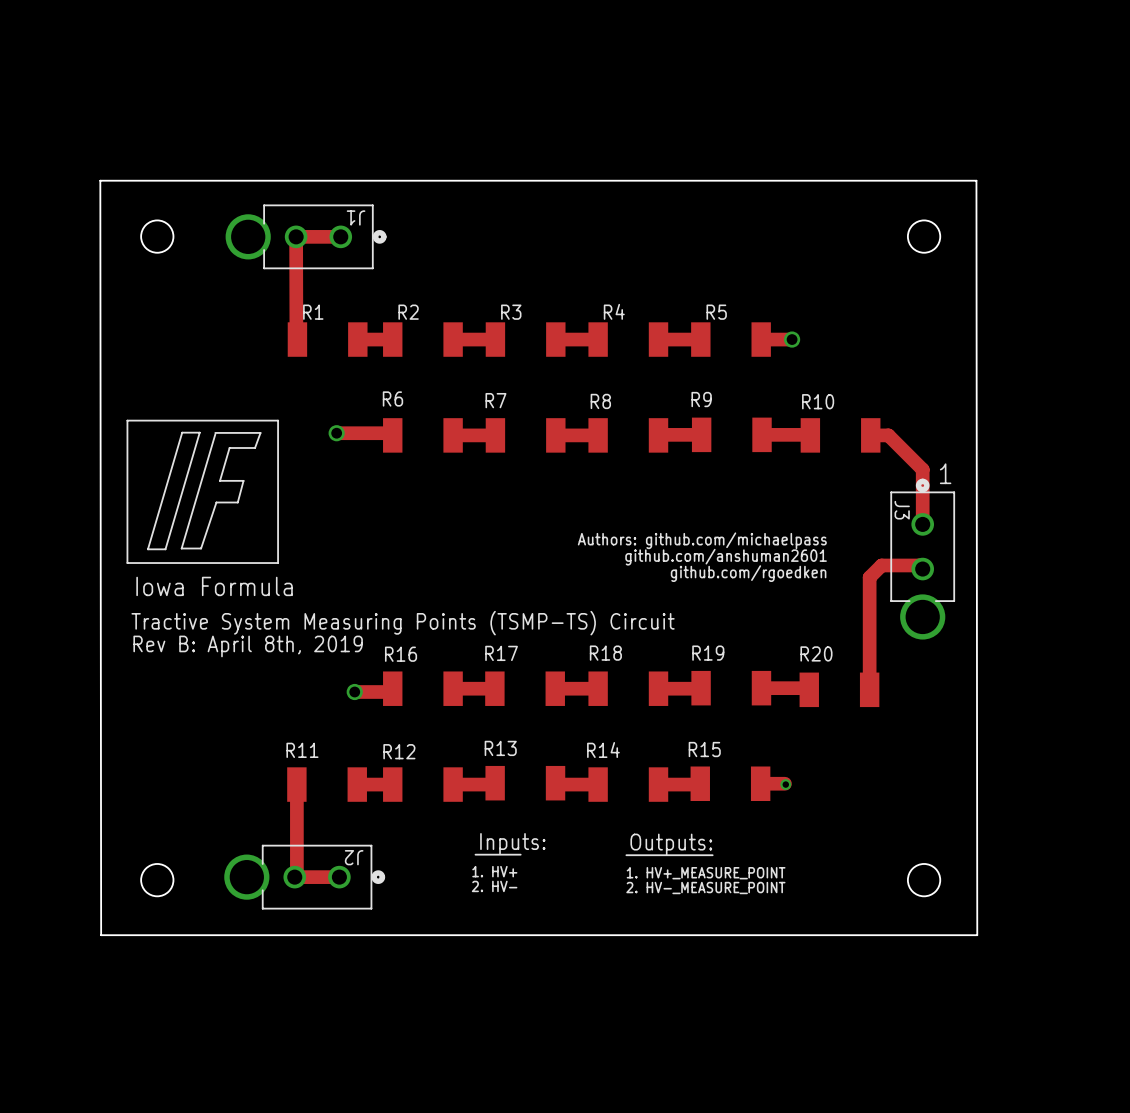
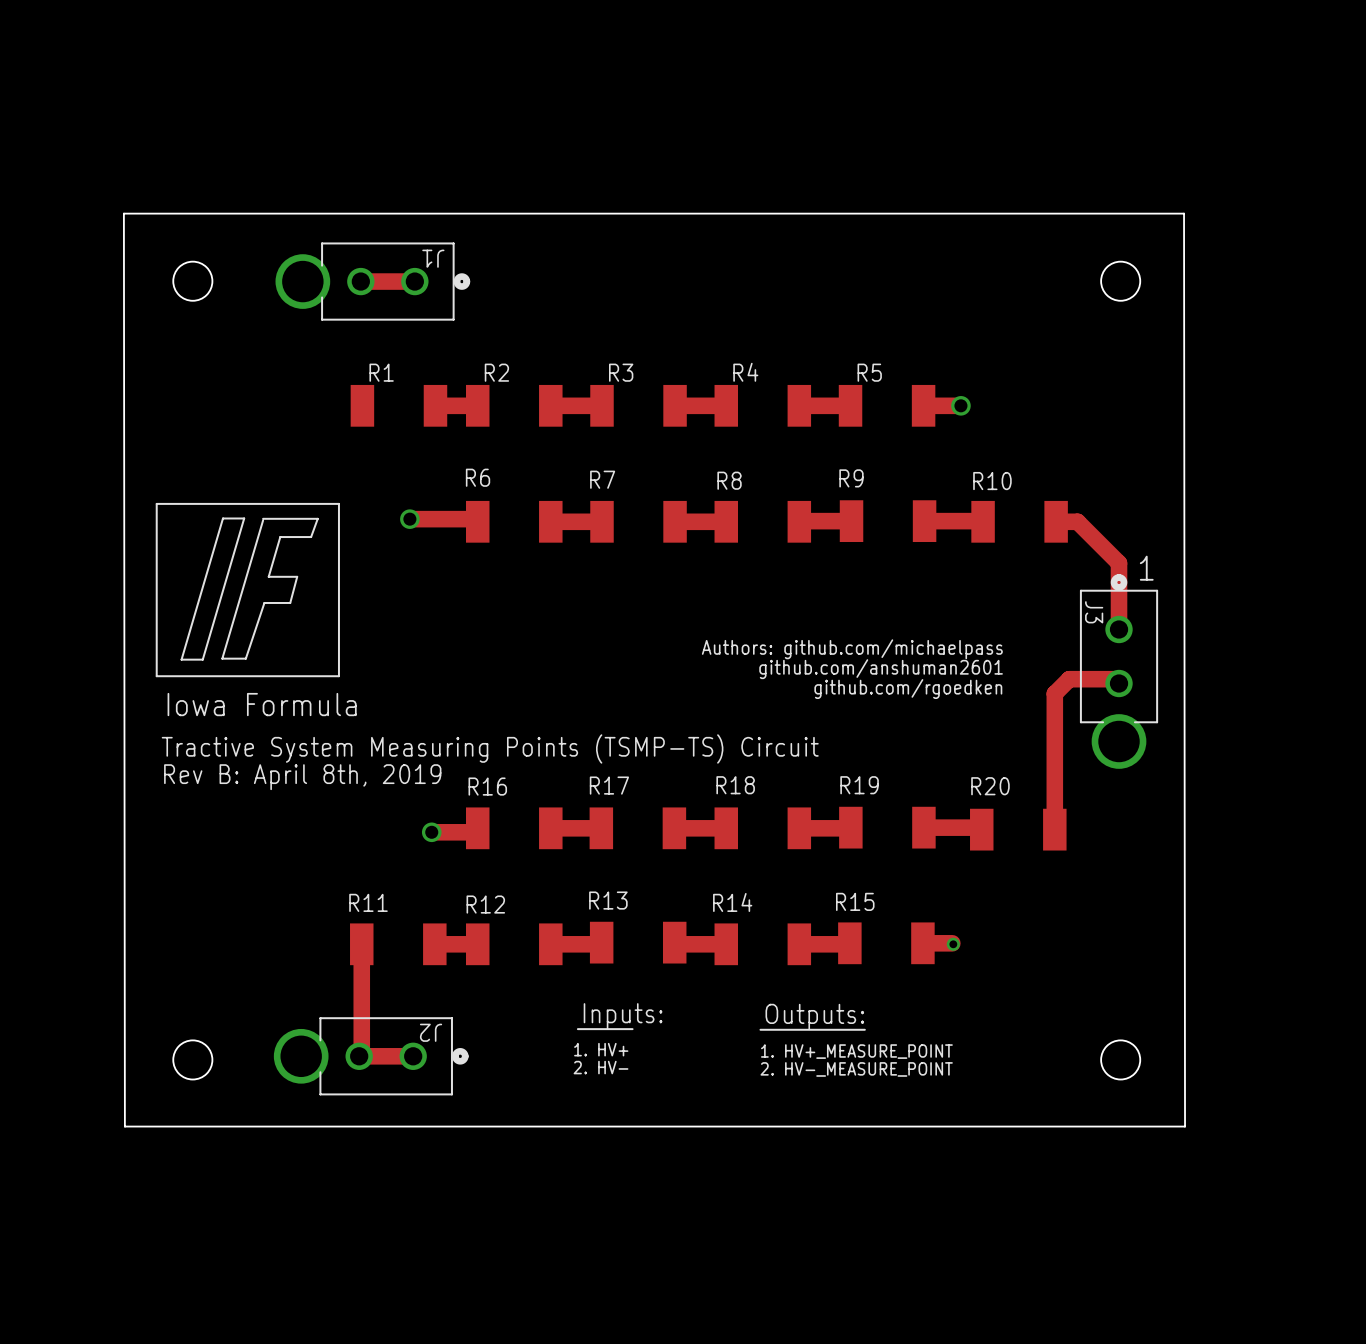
track: (296, 236) (296, 338) -> none

